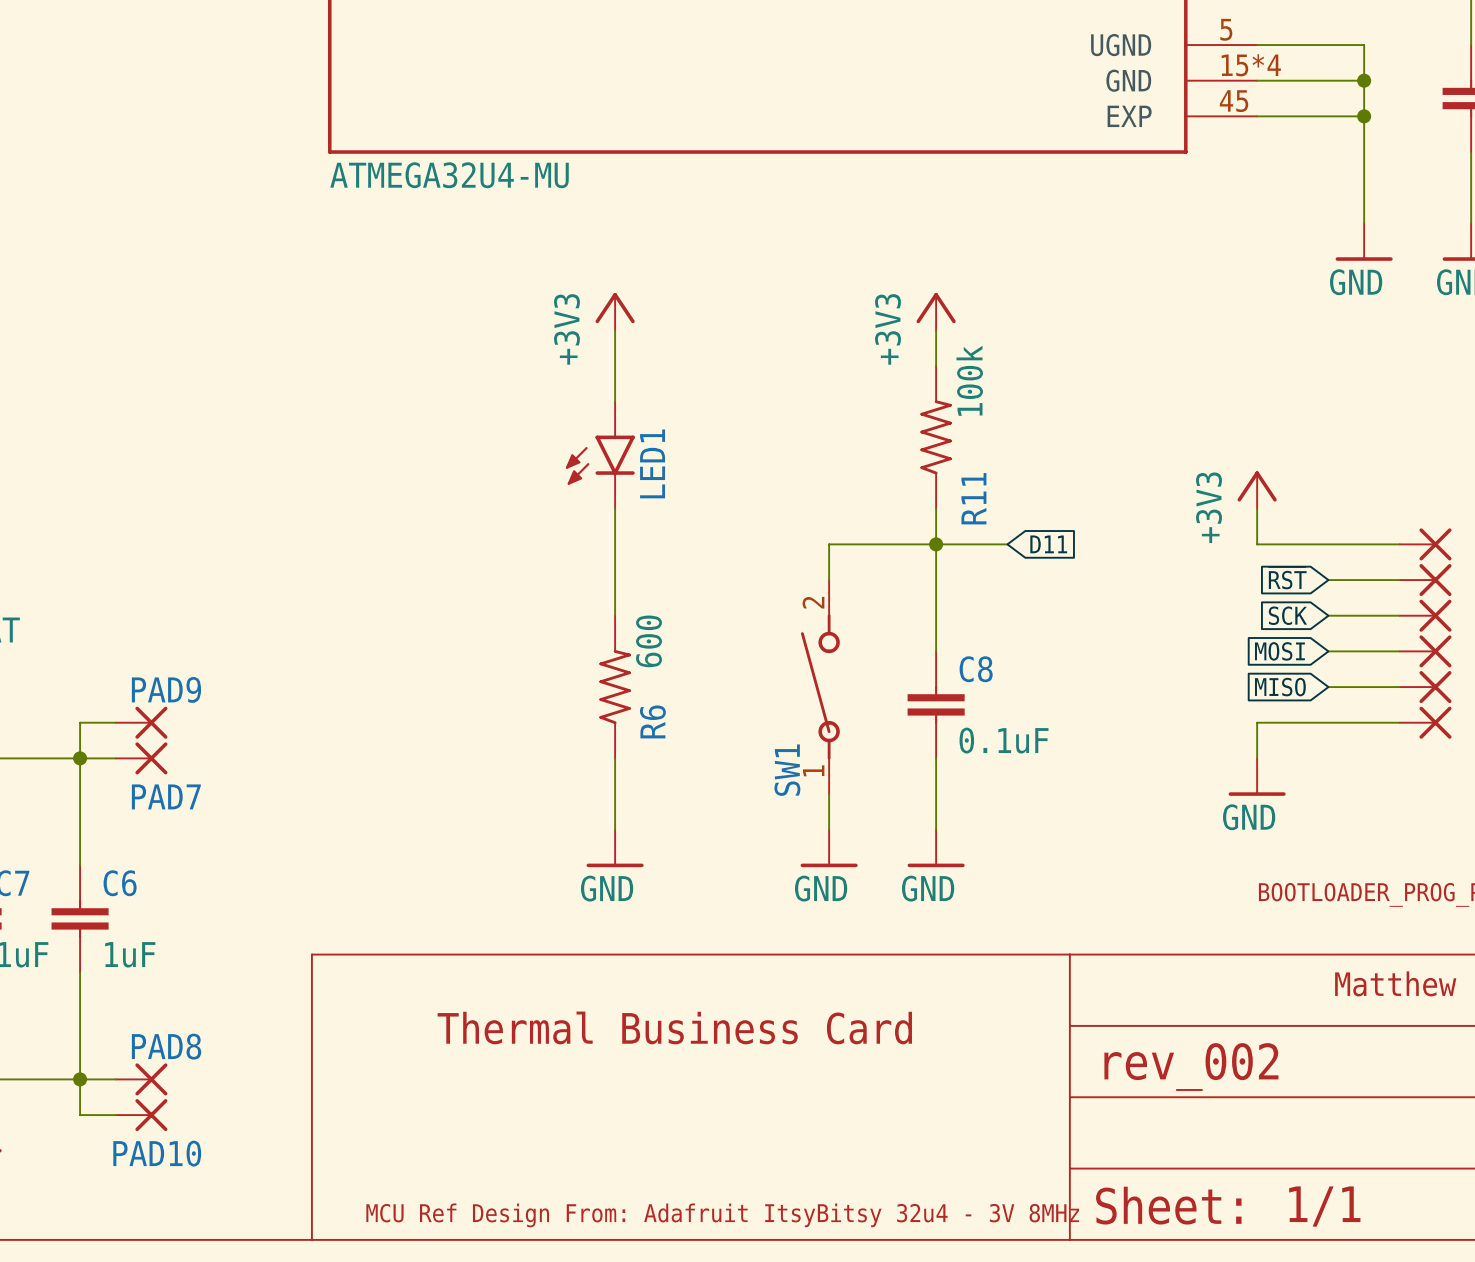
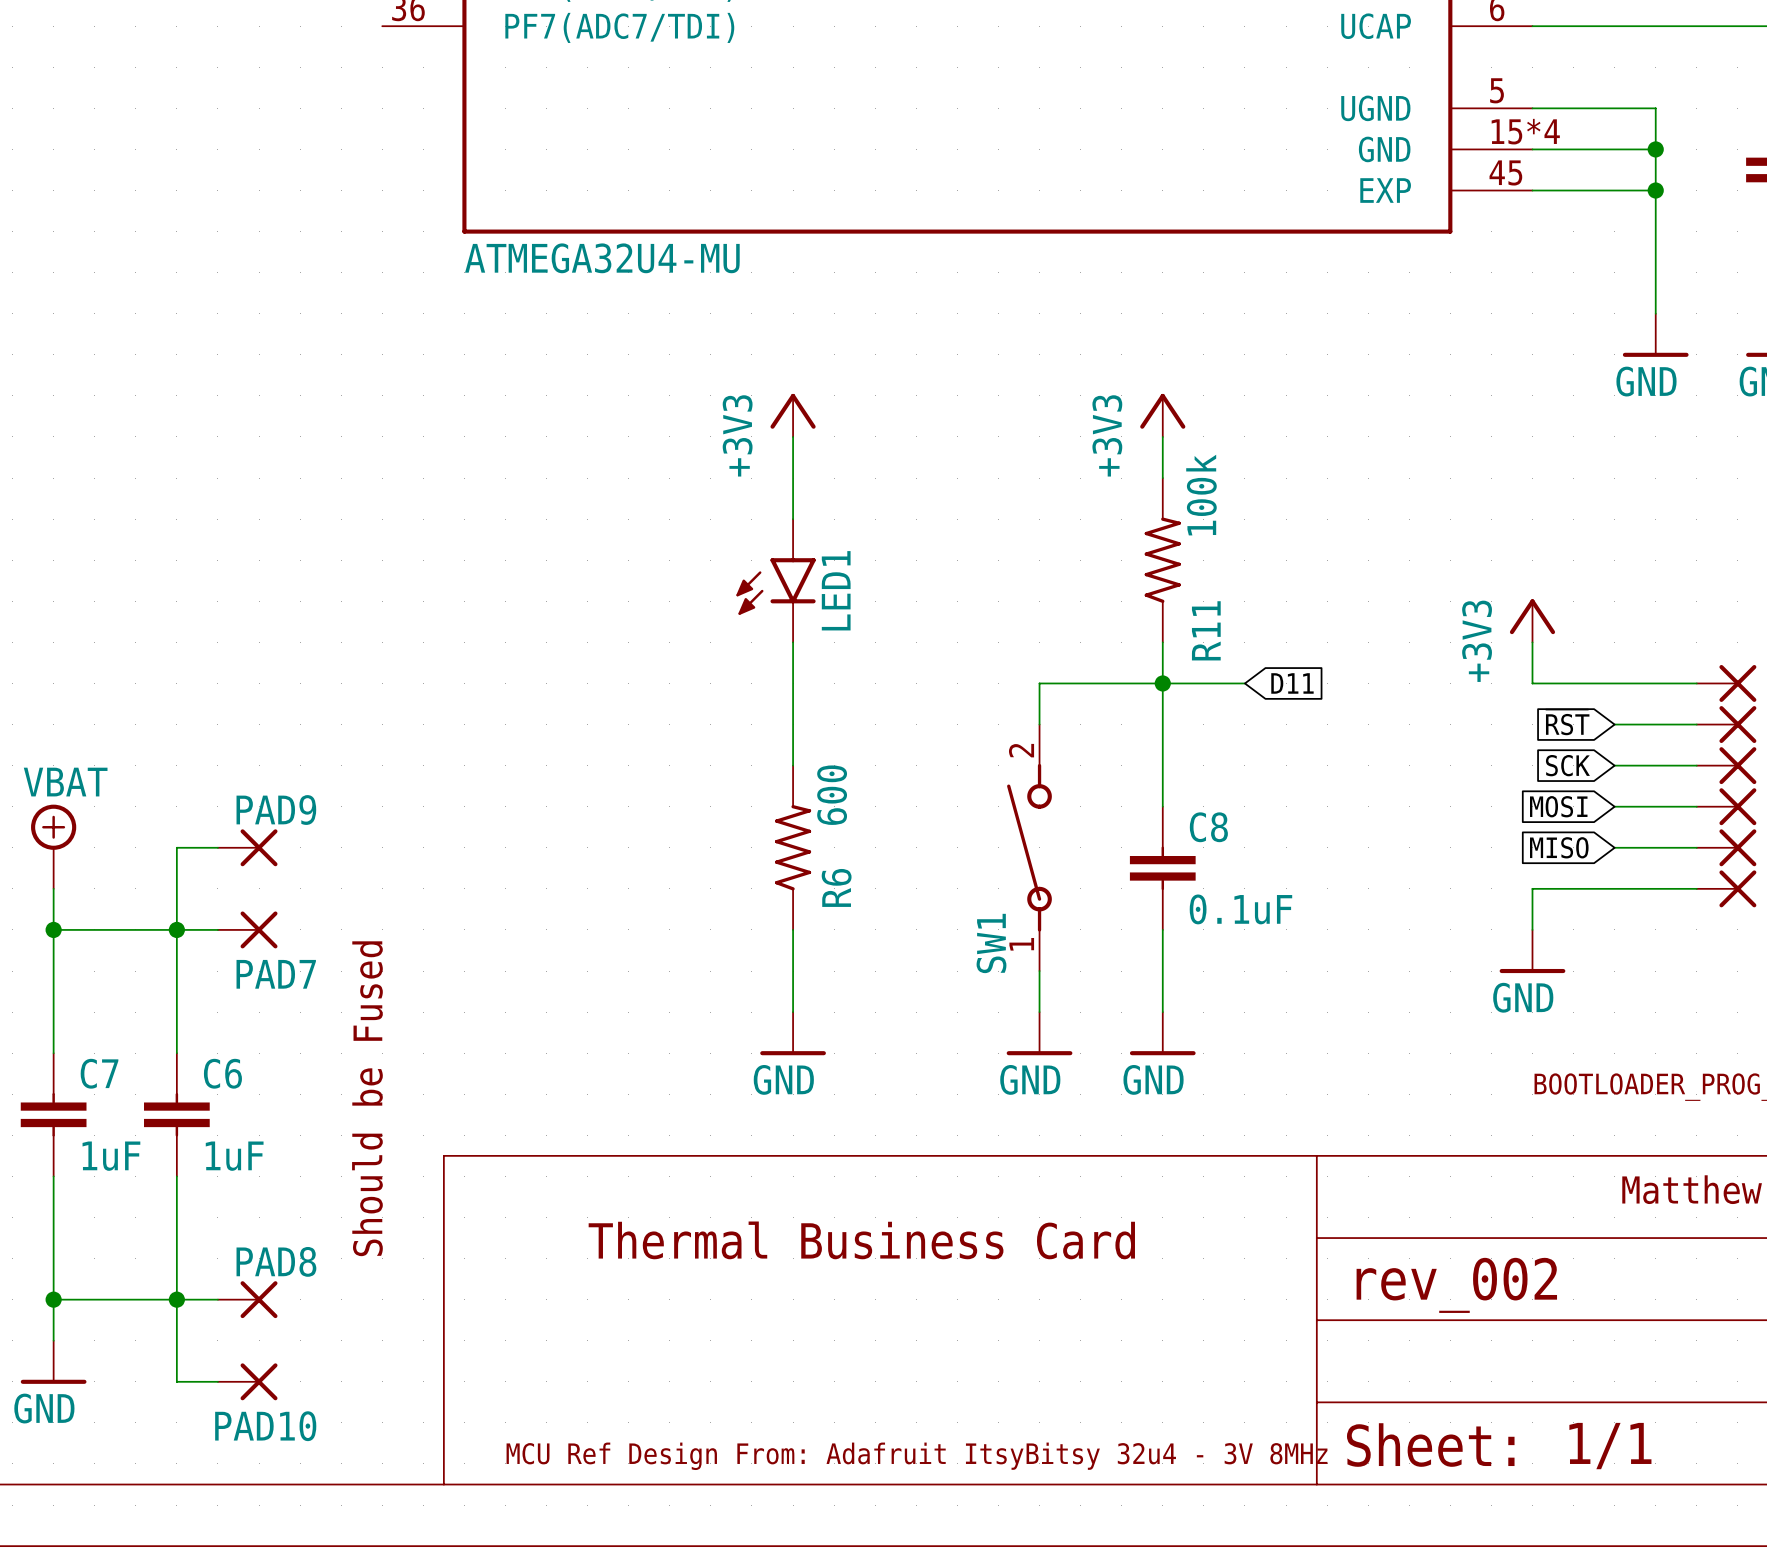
wire: (80, 722) (115, 722) -> (176, 888) (176, 847) (217, 847)
PAD9 position: (141, 722) -> (247, 847)
text: none -> Should be Fused (367, 1098)
wire: (80, 1115) (115, 1115) -> (176, 1340) (176, 1381) (217, 1381)
PAD10 position: (141, 1115) -> (247, 1381)

